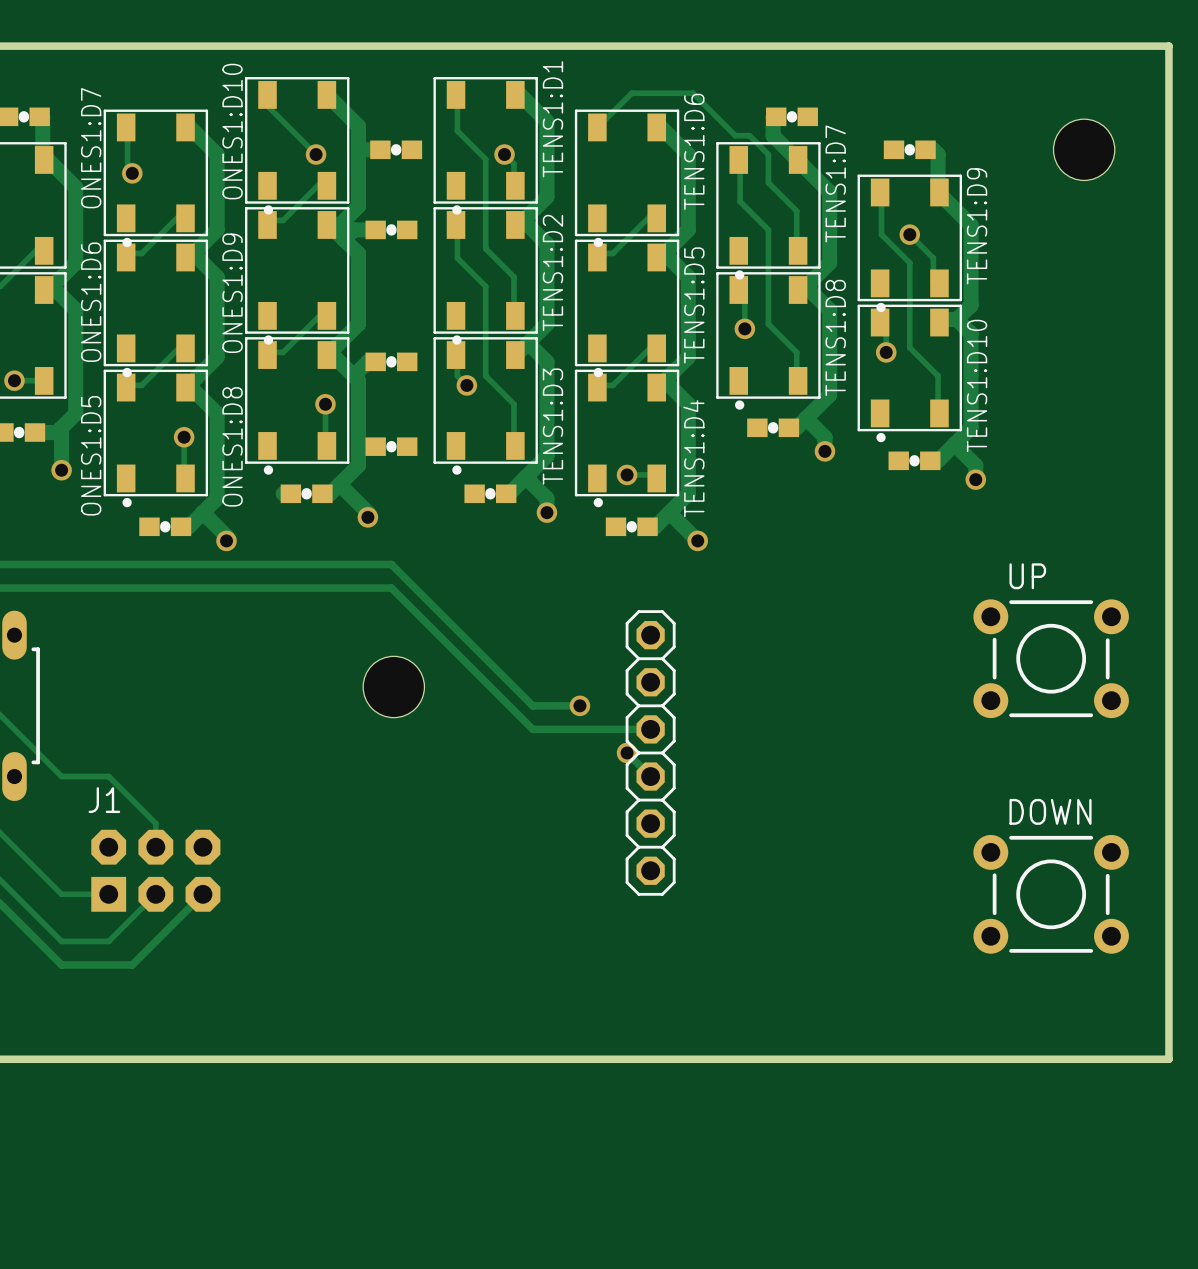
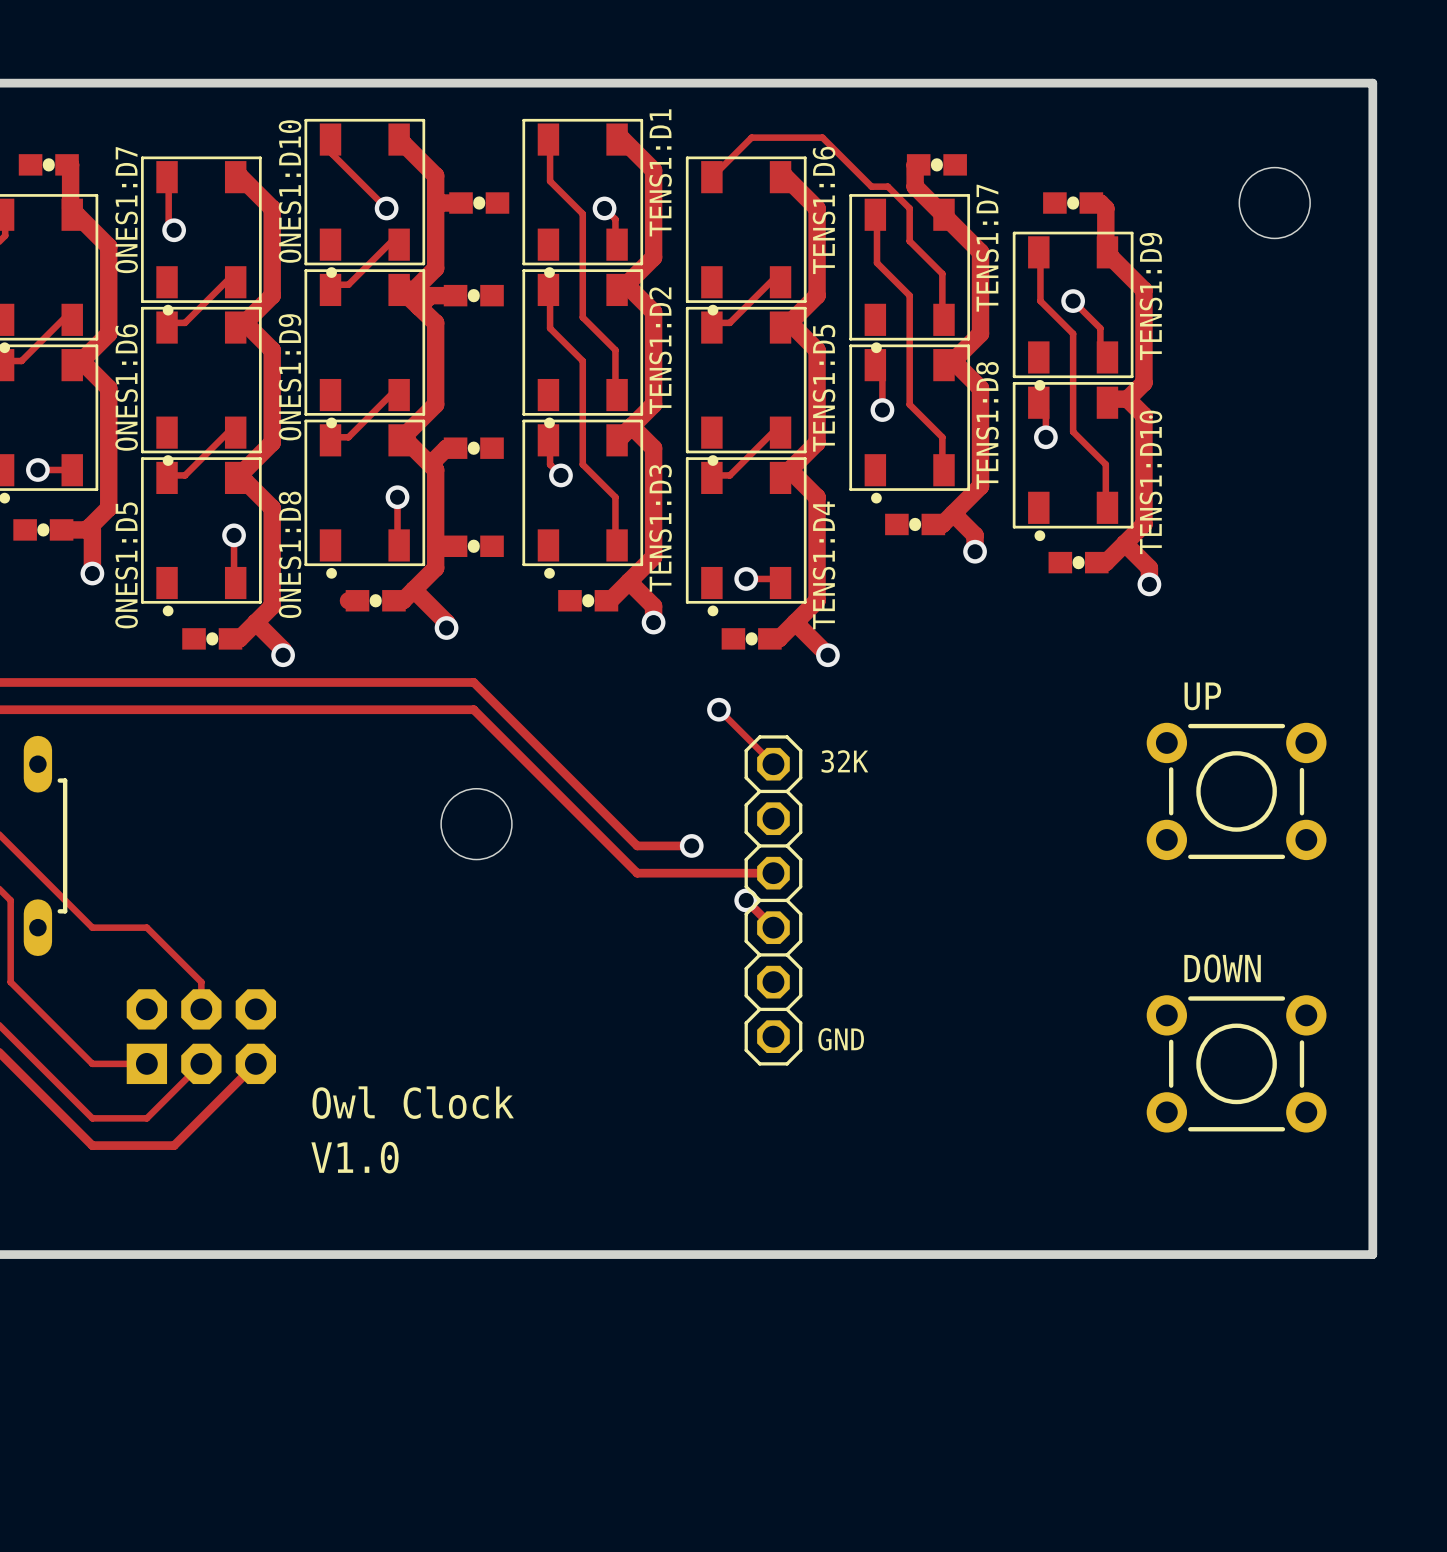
track: none -> (718, 709) (773, 764)
via: none -> (718, 709)
text: none -> 32K (844, 761)
J1 name: J1 (104, 800) -> none
text: none -> GND (841, 1039)
text: none -> Owl Clock (413, 1102)
text: none -> V1.0 (354, 1157)

